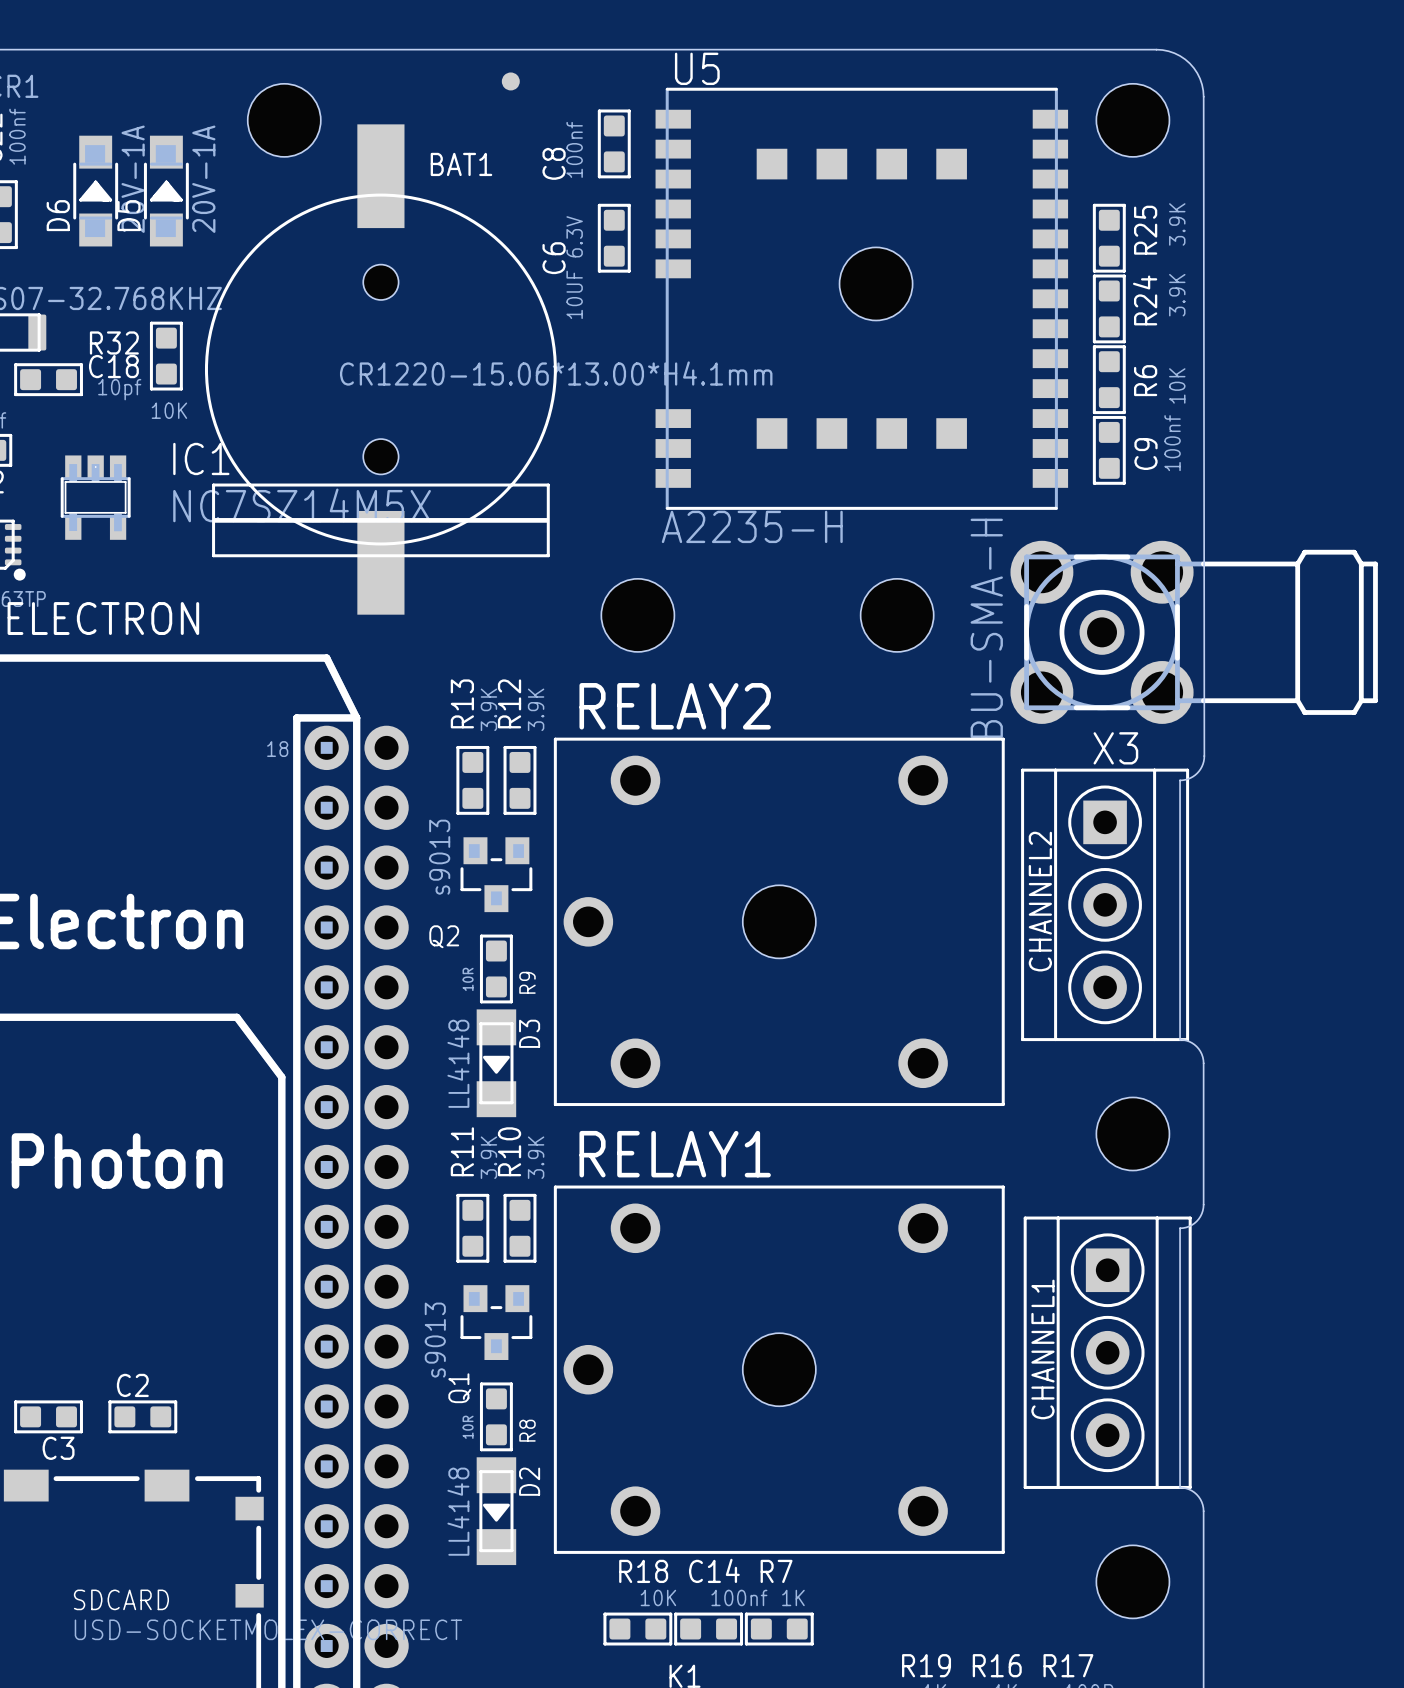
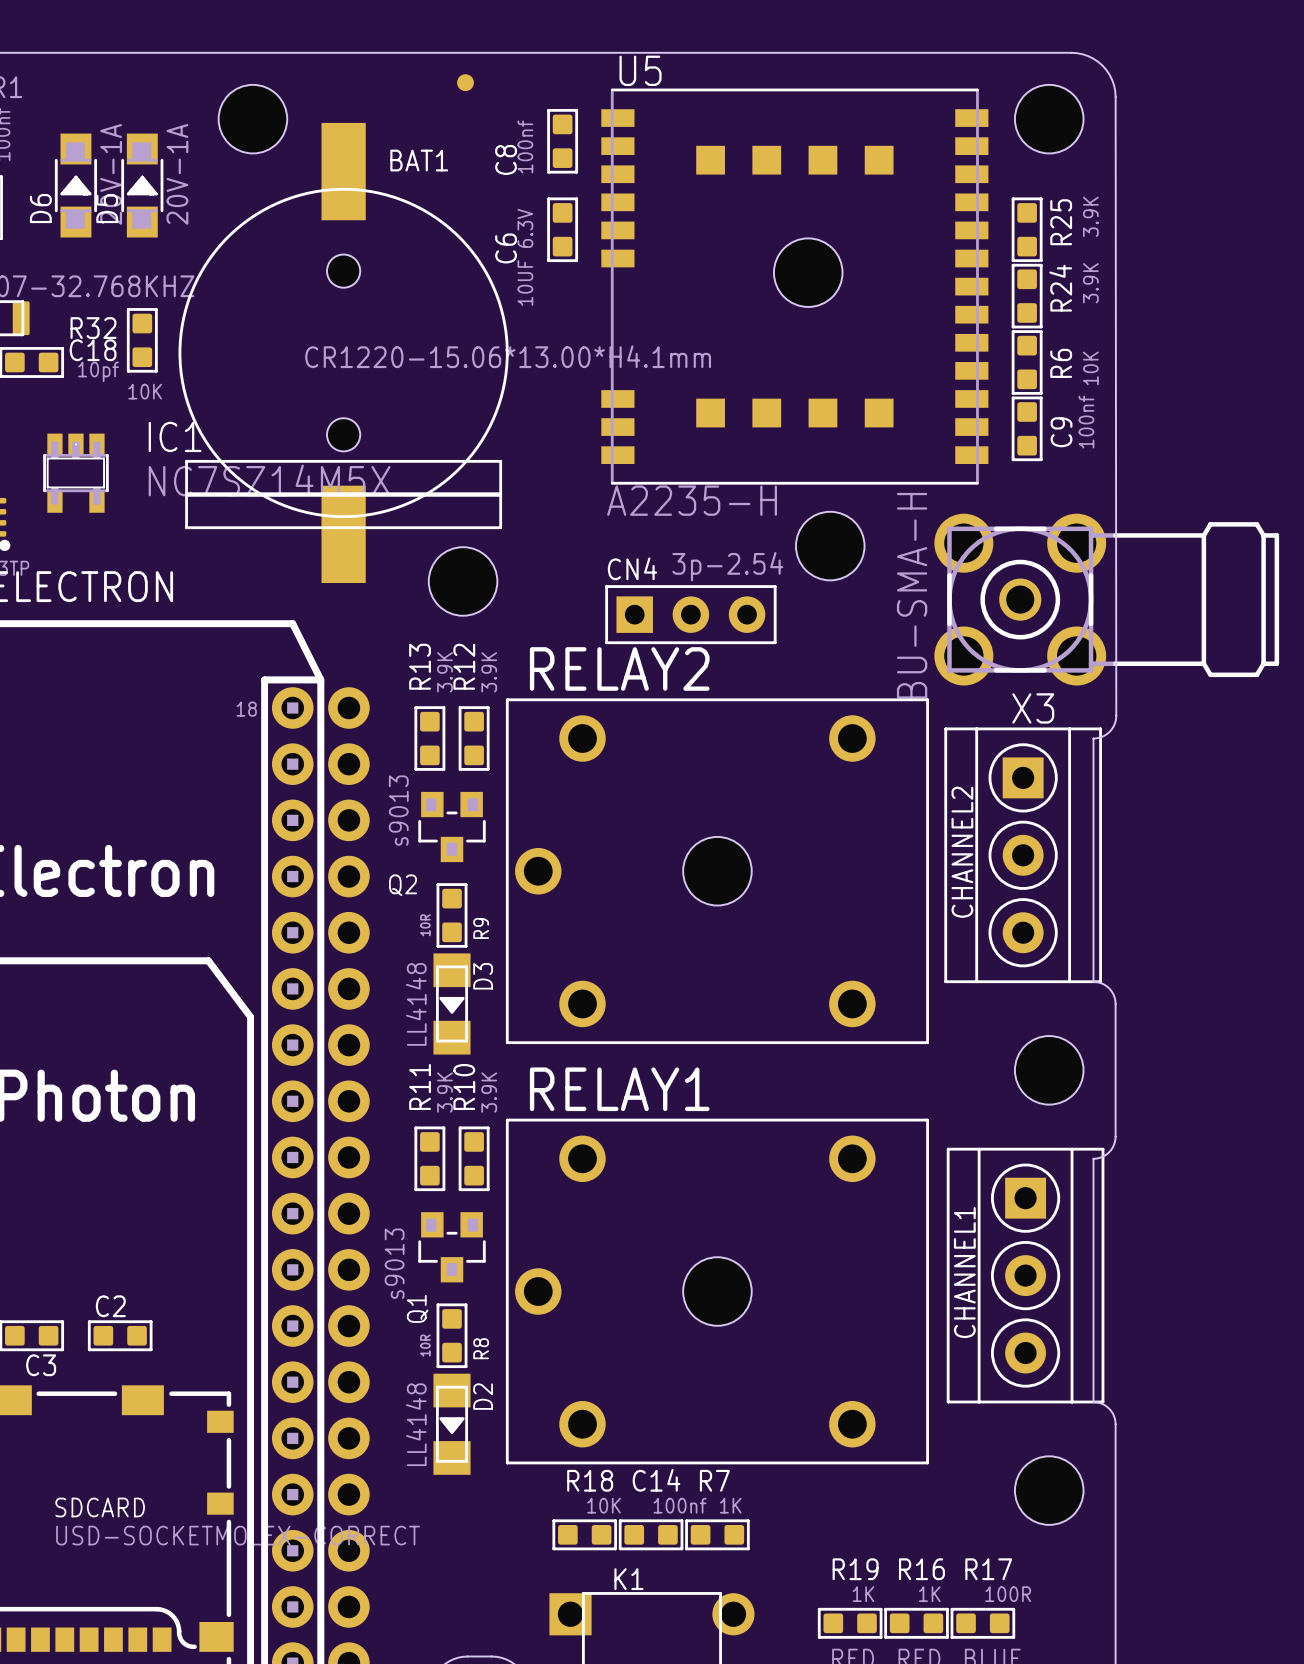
hole position: (637, 615) -> (463, 581)
hole position: (897, 615) -> (830, 546)
CN4: none -> 3p-2.54 (690, 614)

